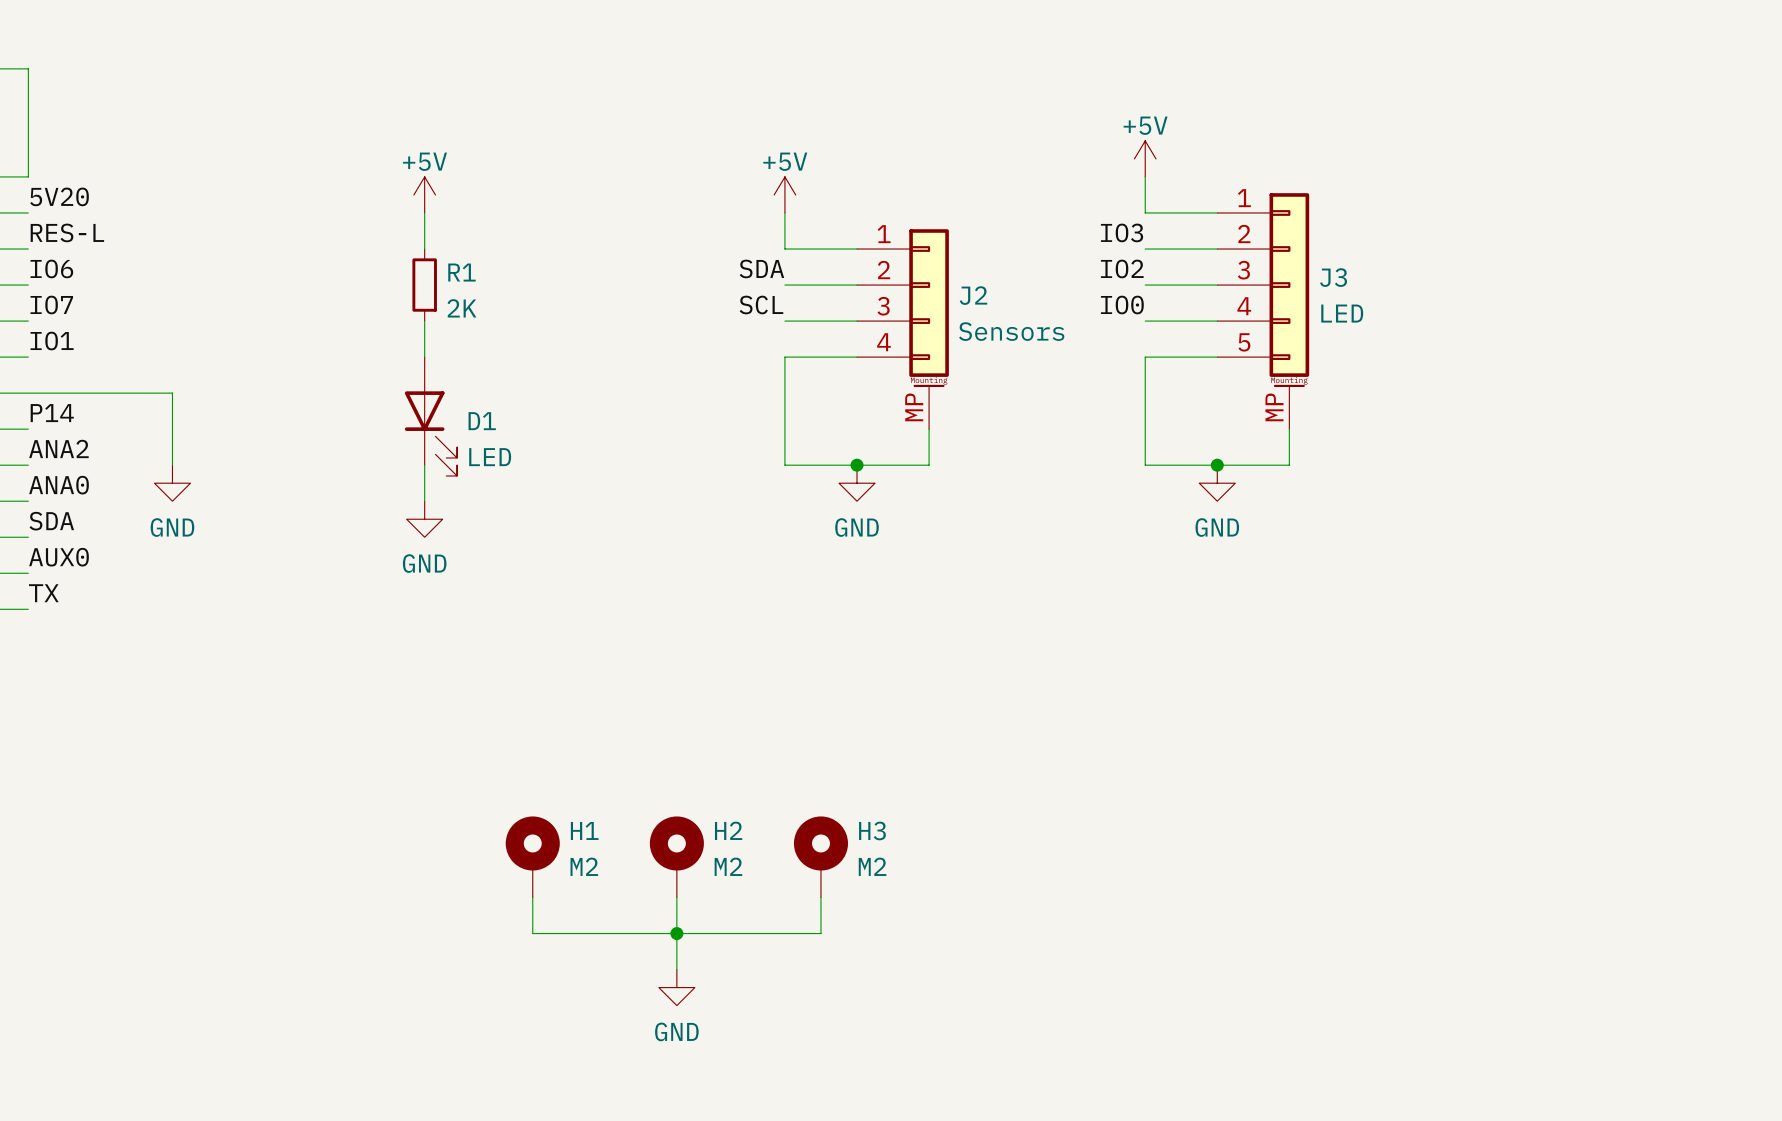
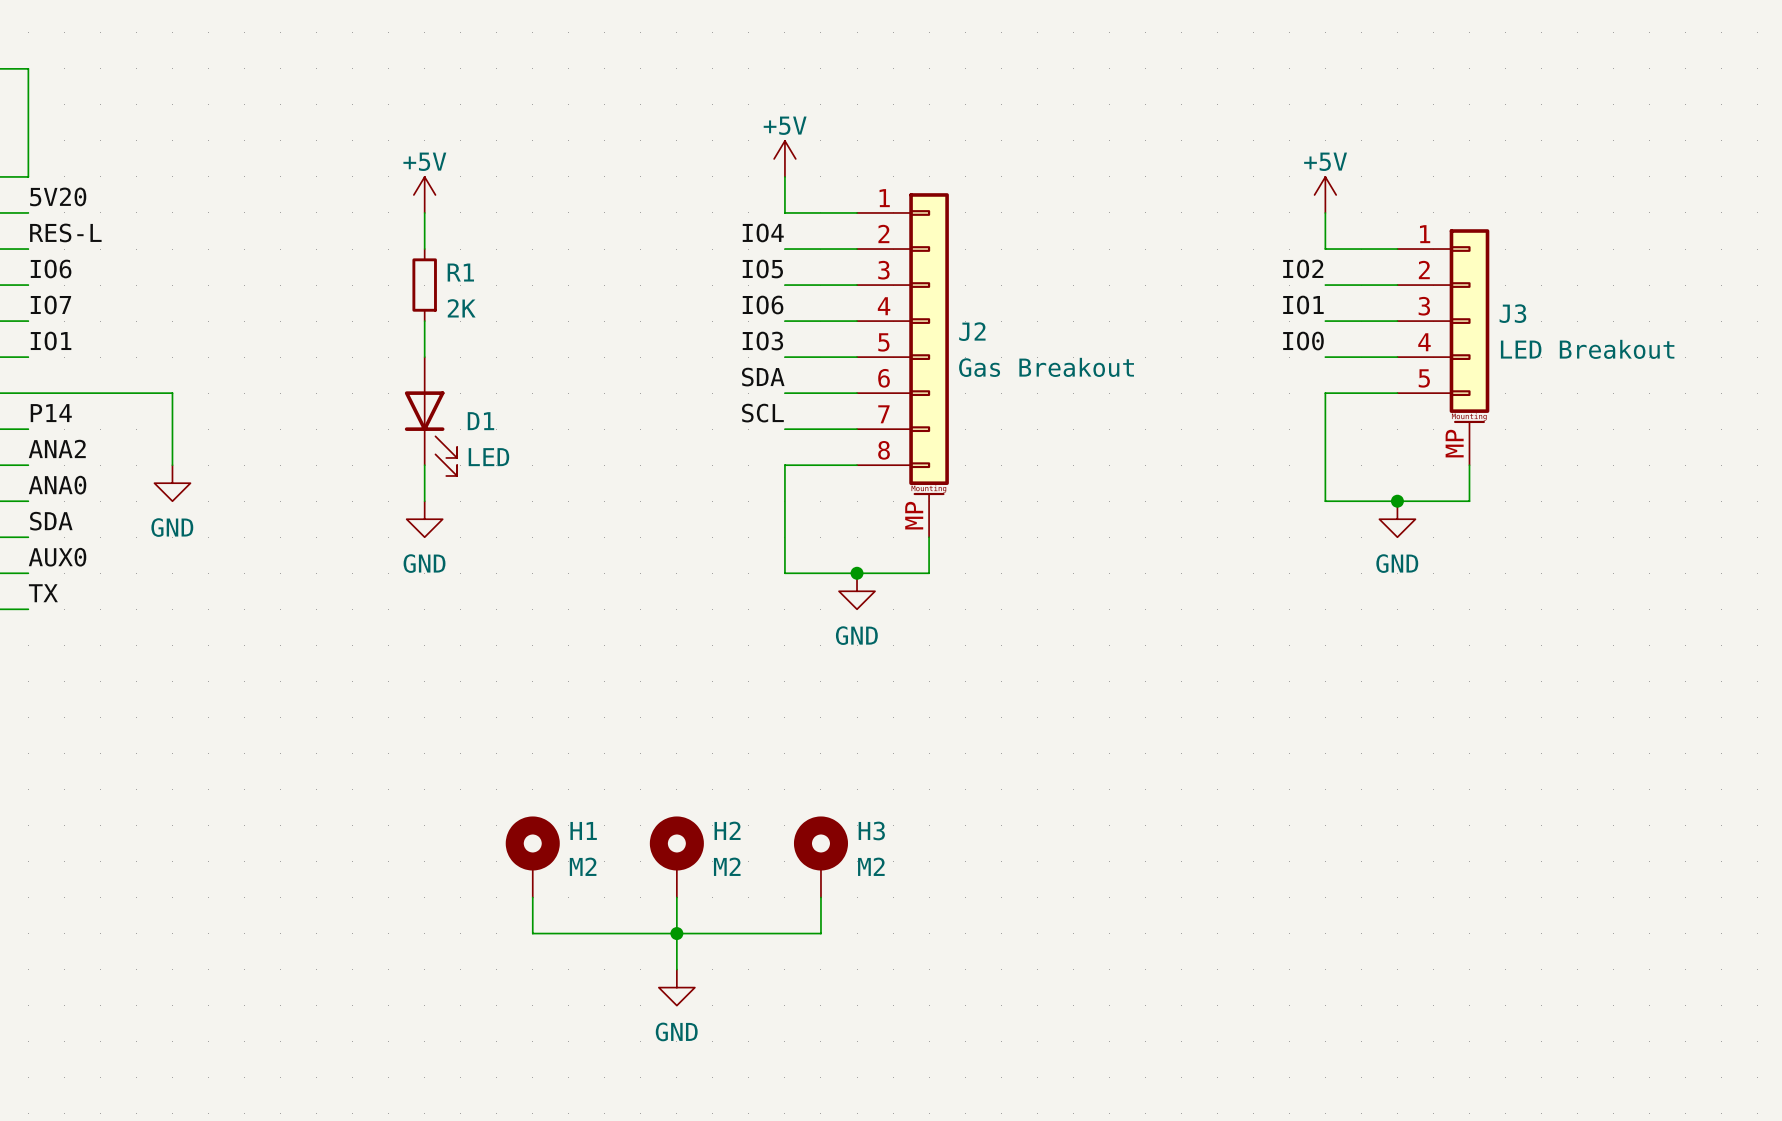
power symbol: +5V (1145, 158) -> none
wire: none -> (784, 176) (784, 212) (857, 212)
wire: (1145, 176) (1145, 212) (1217, 212) -> (1325, 212) (1325, 249) (1397, 249)
power symbol position: +5V (784, 194) -> +5V (784, 158)
power symbol: none -> +5V (1325, 194)
wire: (784, 212) (784, 249) -> none
J2 symbol: [857, 229, 949, 430] -> [857, 193, 949, 538]
label: none -> IO4 (763, 232)
label: IO3 (1122, 232) -> none
wire: (1145, 249) (1217, 249) -> (1325, 285) (1397, 285)
label: SDA (761, 268) -> IO5 (762, 268)
label position: IO2 (1122, 268) -> IO2 (1303, 268)
wire: (1145, 285) (1217, 285) -> (1325, 321) (1397, 321)
label: SCL (761, 304) -> IO6 (763, 305)
label position: IO0 (1122, 304) -> IO0 (1303, 341)
label: none -> IO1 (1303, 305)
J3 position: (1263, 311) -> (1443, 347)
J3 value: LED (1342, 313) -> LED Breakout (1587, 349)
wire: (1145, 321) (1217, 321) -> (1325, 357) (1397, 357)
J2 value: Sensors (1011, 331) -> Gas Breakout (1046, 367)
label: none -> IO3 (762, 341)
wire: (784, 357) (784, 465) -> (929, 537) (929, 573) (784, 573) (784, 465)
wire: (1217, 357) (1145, 357) (1145, 465) (1289, 465) (1289, 429) -> (1397, 393) (1325, 393) (1325, 501) (1469, 501) (1469, 465)
label: none -> SDA (763, 377)
wire: none -> (784, 393) (857, 393)
label: none -> SCL (762, 413)
wire: none -> (784, 429) (857, 429)
junction: (857, 465) -> none
junction: (1217, 465) -> none
power symbol position: GND (857, 483) -> GND (857, 591)
power symbol position: GND (1217, 483) -> GND (1397, 519)
junction: none -> (1397, 501)
junction: none -> (857, 573)

